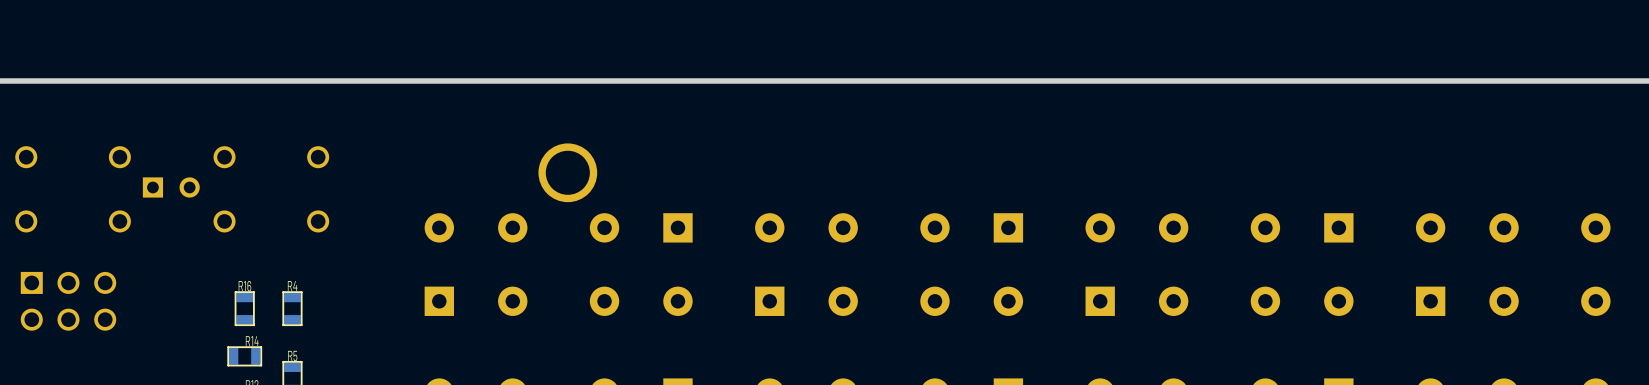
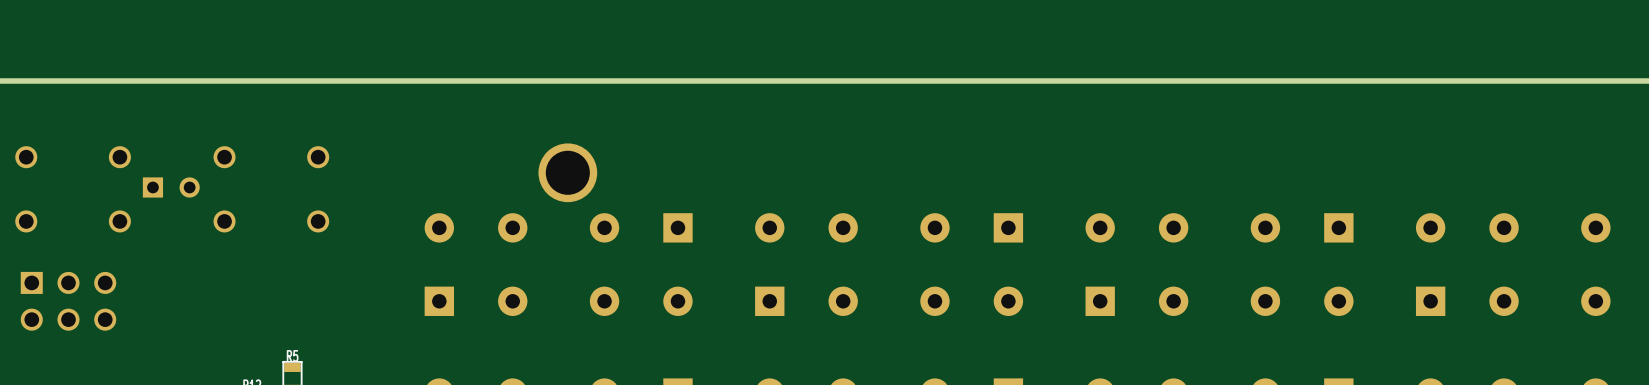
R16: (244, 308) -> none
R4: (292, 308) -> none
R14: (244, 356) -> none

